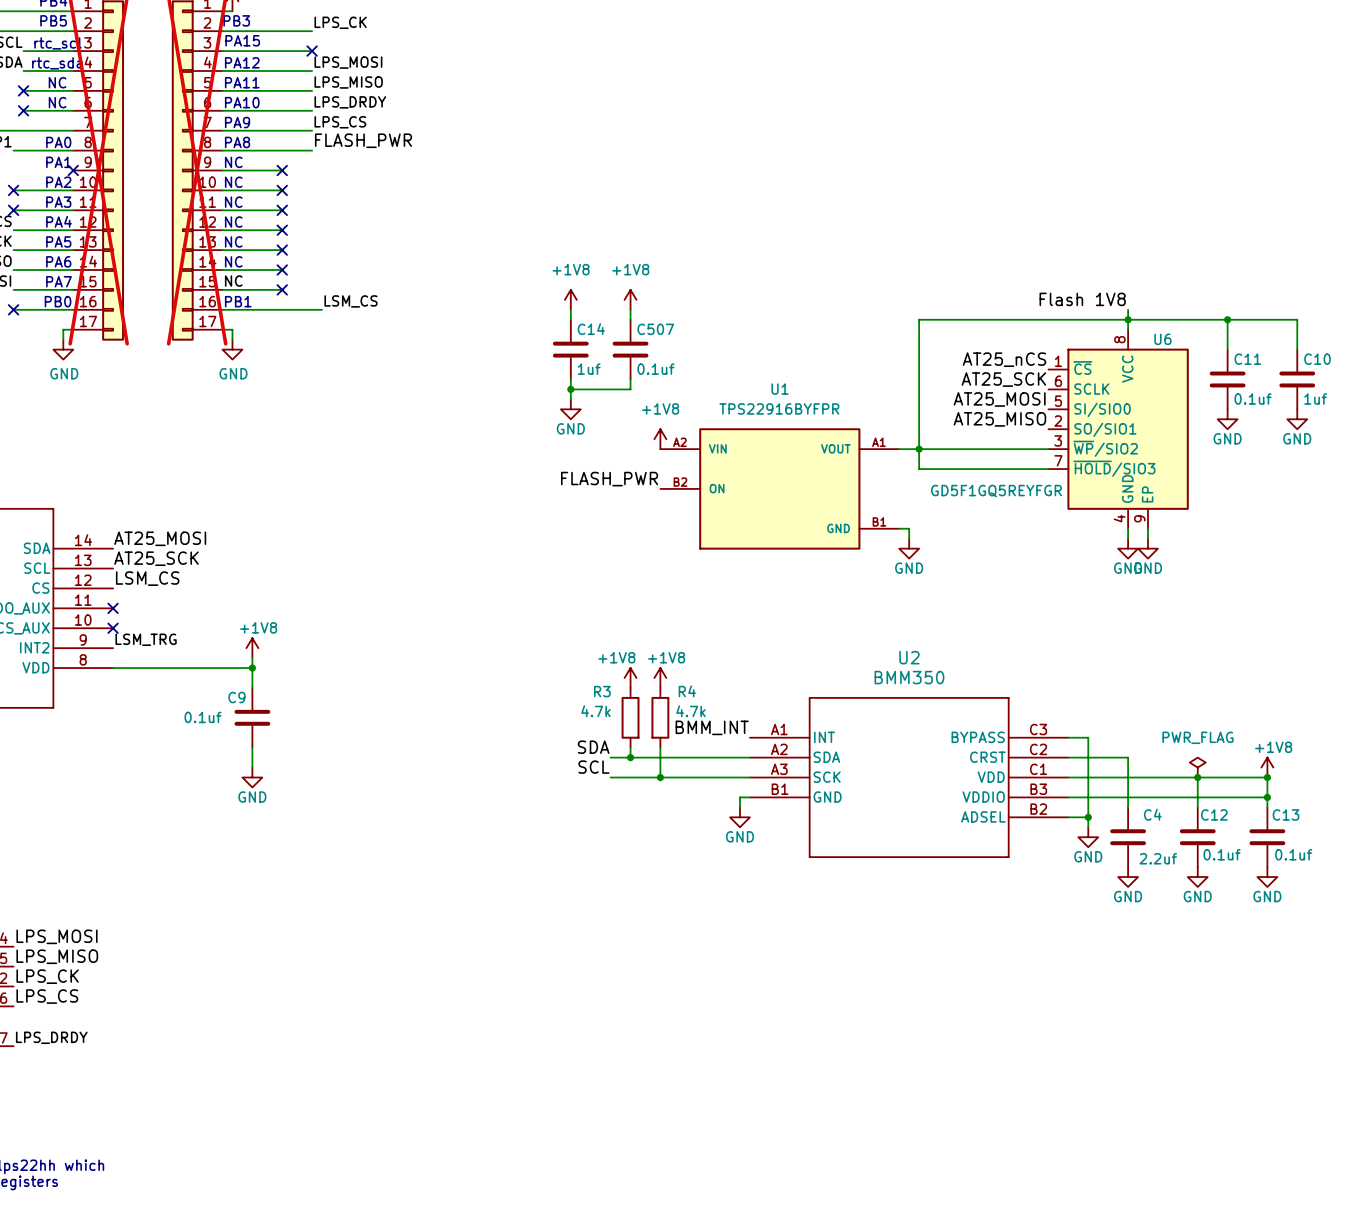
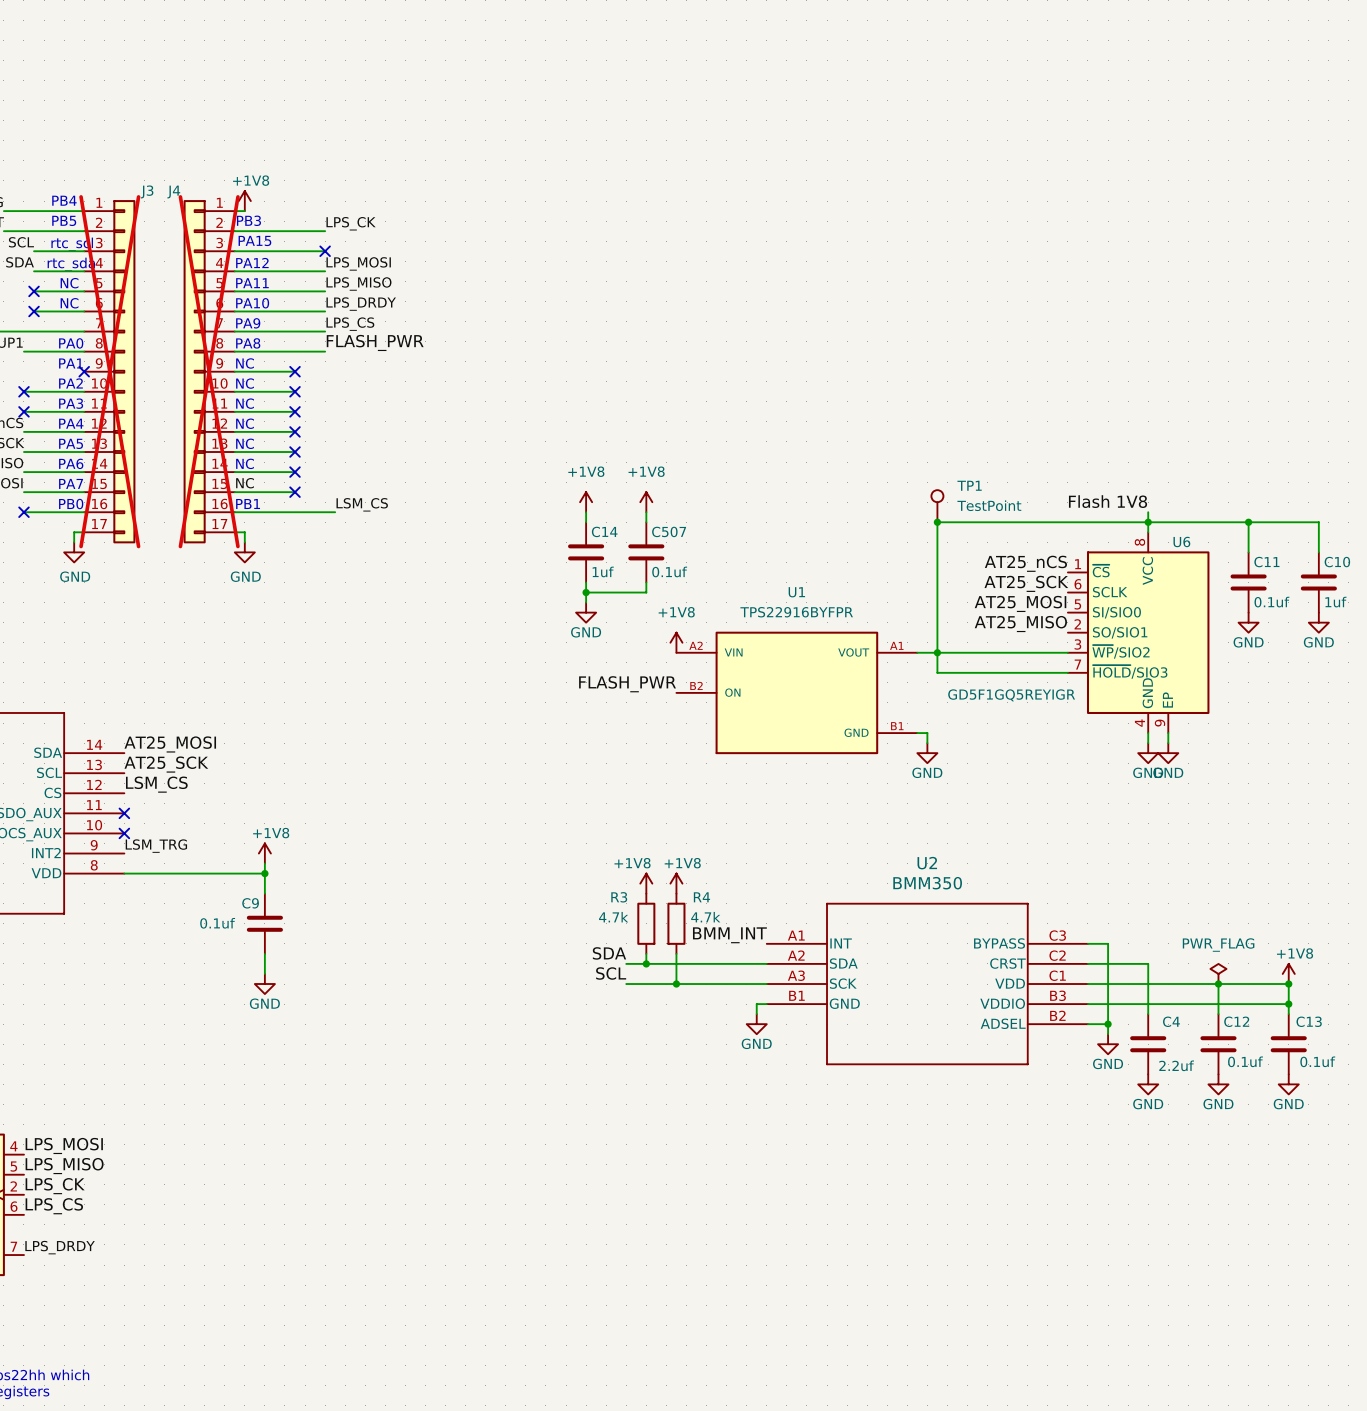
TP1: none -> TestPoint (937, 506)
junction: none -> (937, 522)
U6 value: GD5F1GQ5REYFGR (996, 491) -> GD5F1GQ5REYIGR (1011, 695)

